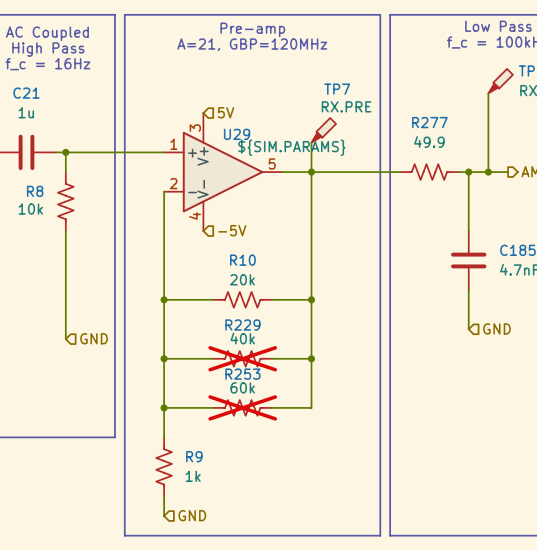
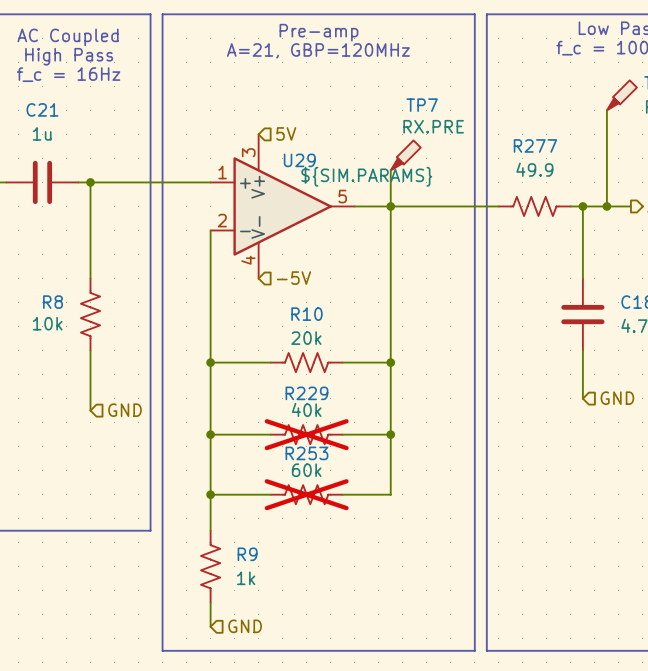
R8 position: (65, 201) -> (90, 314)

